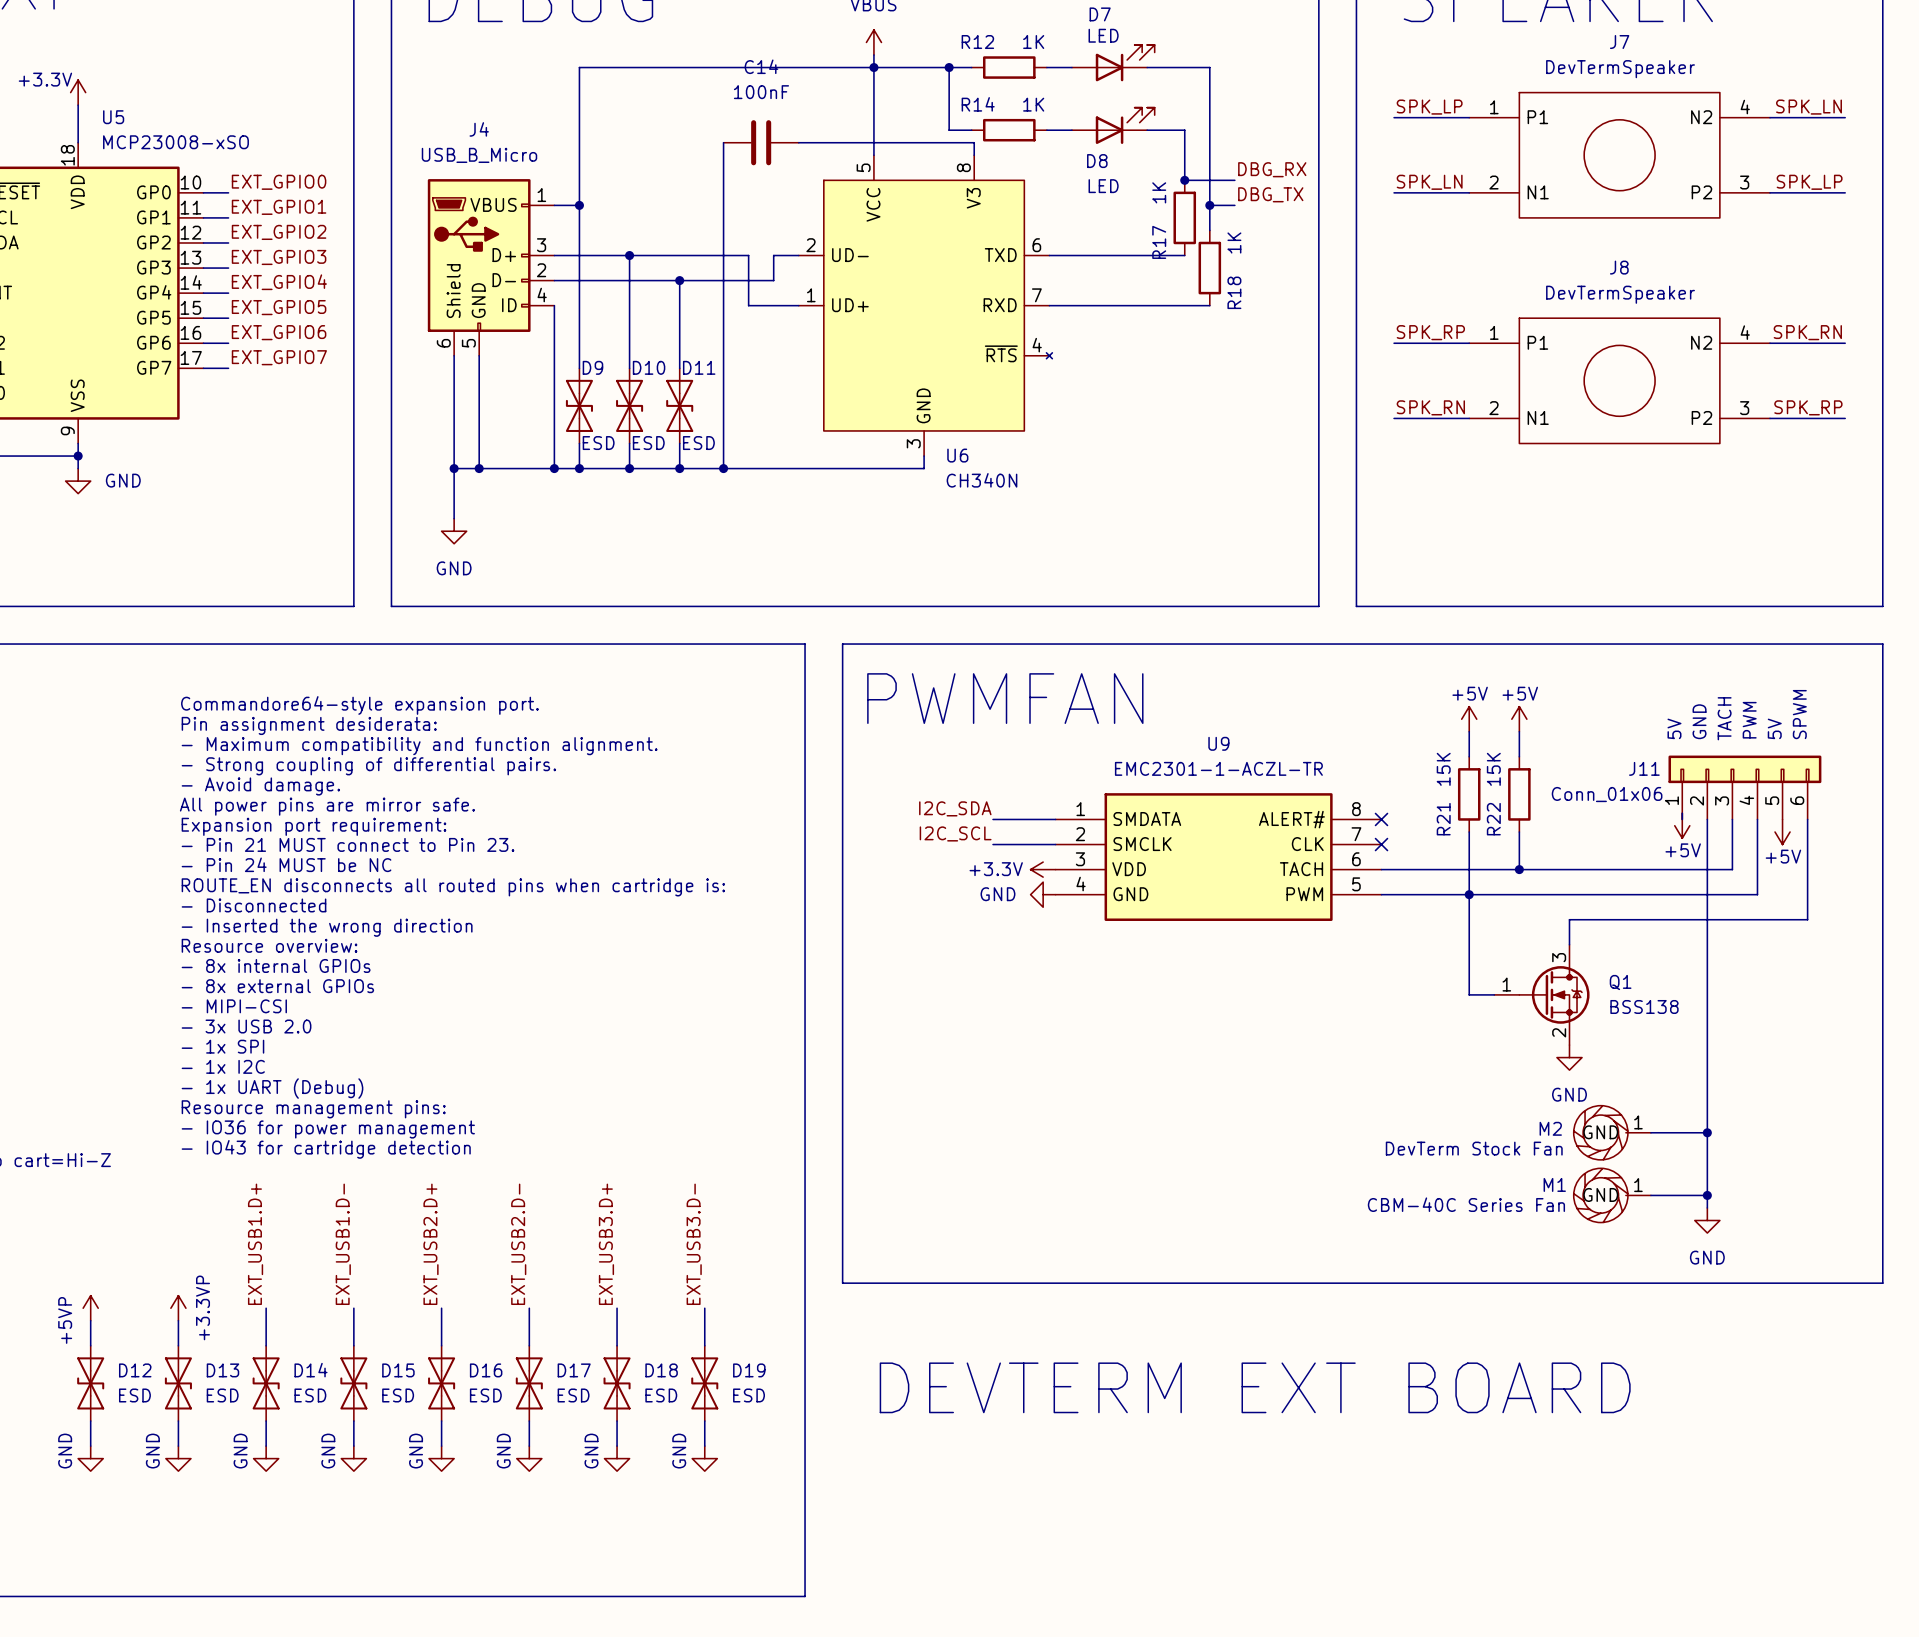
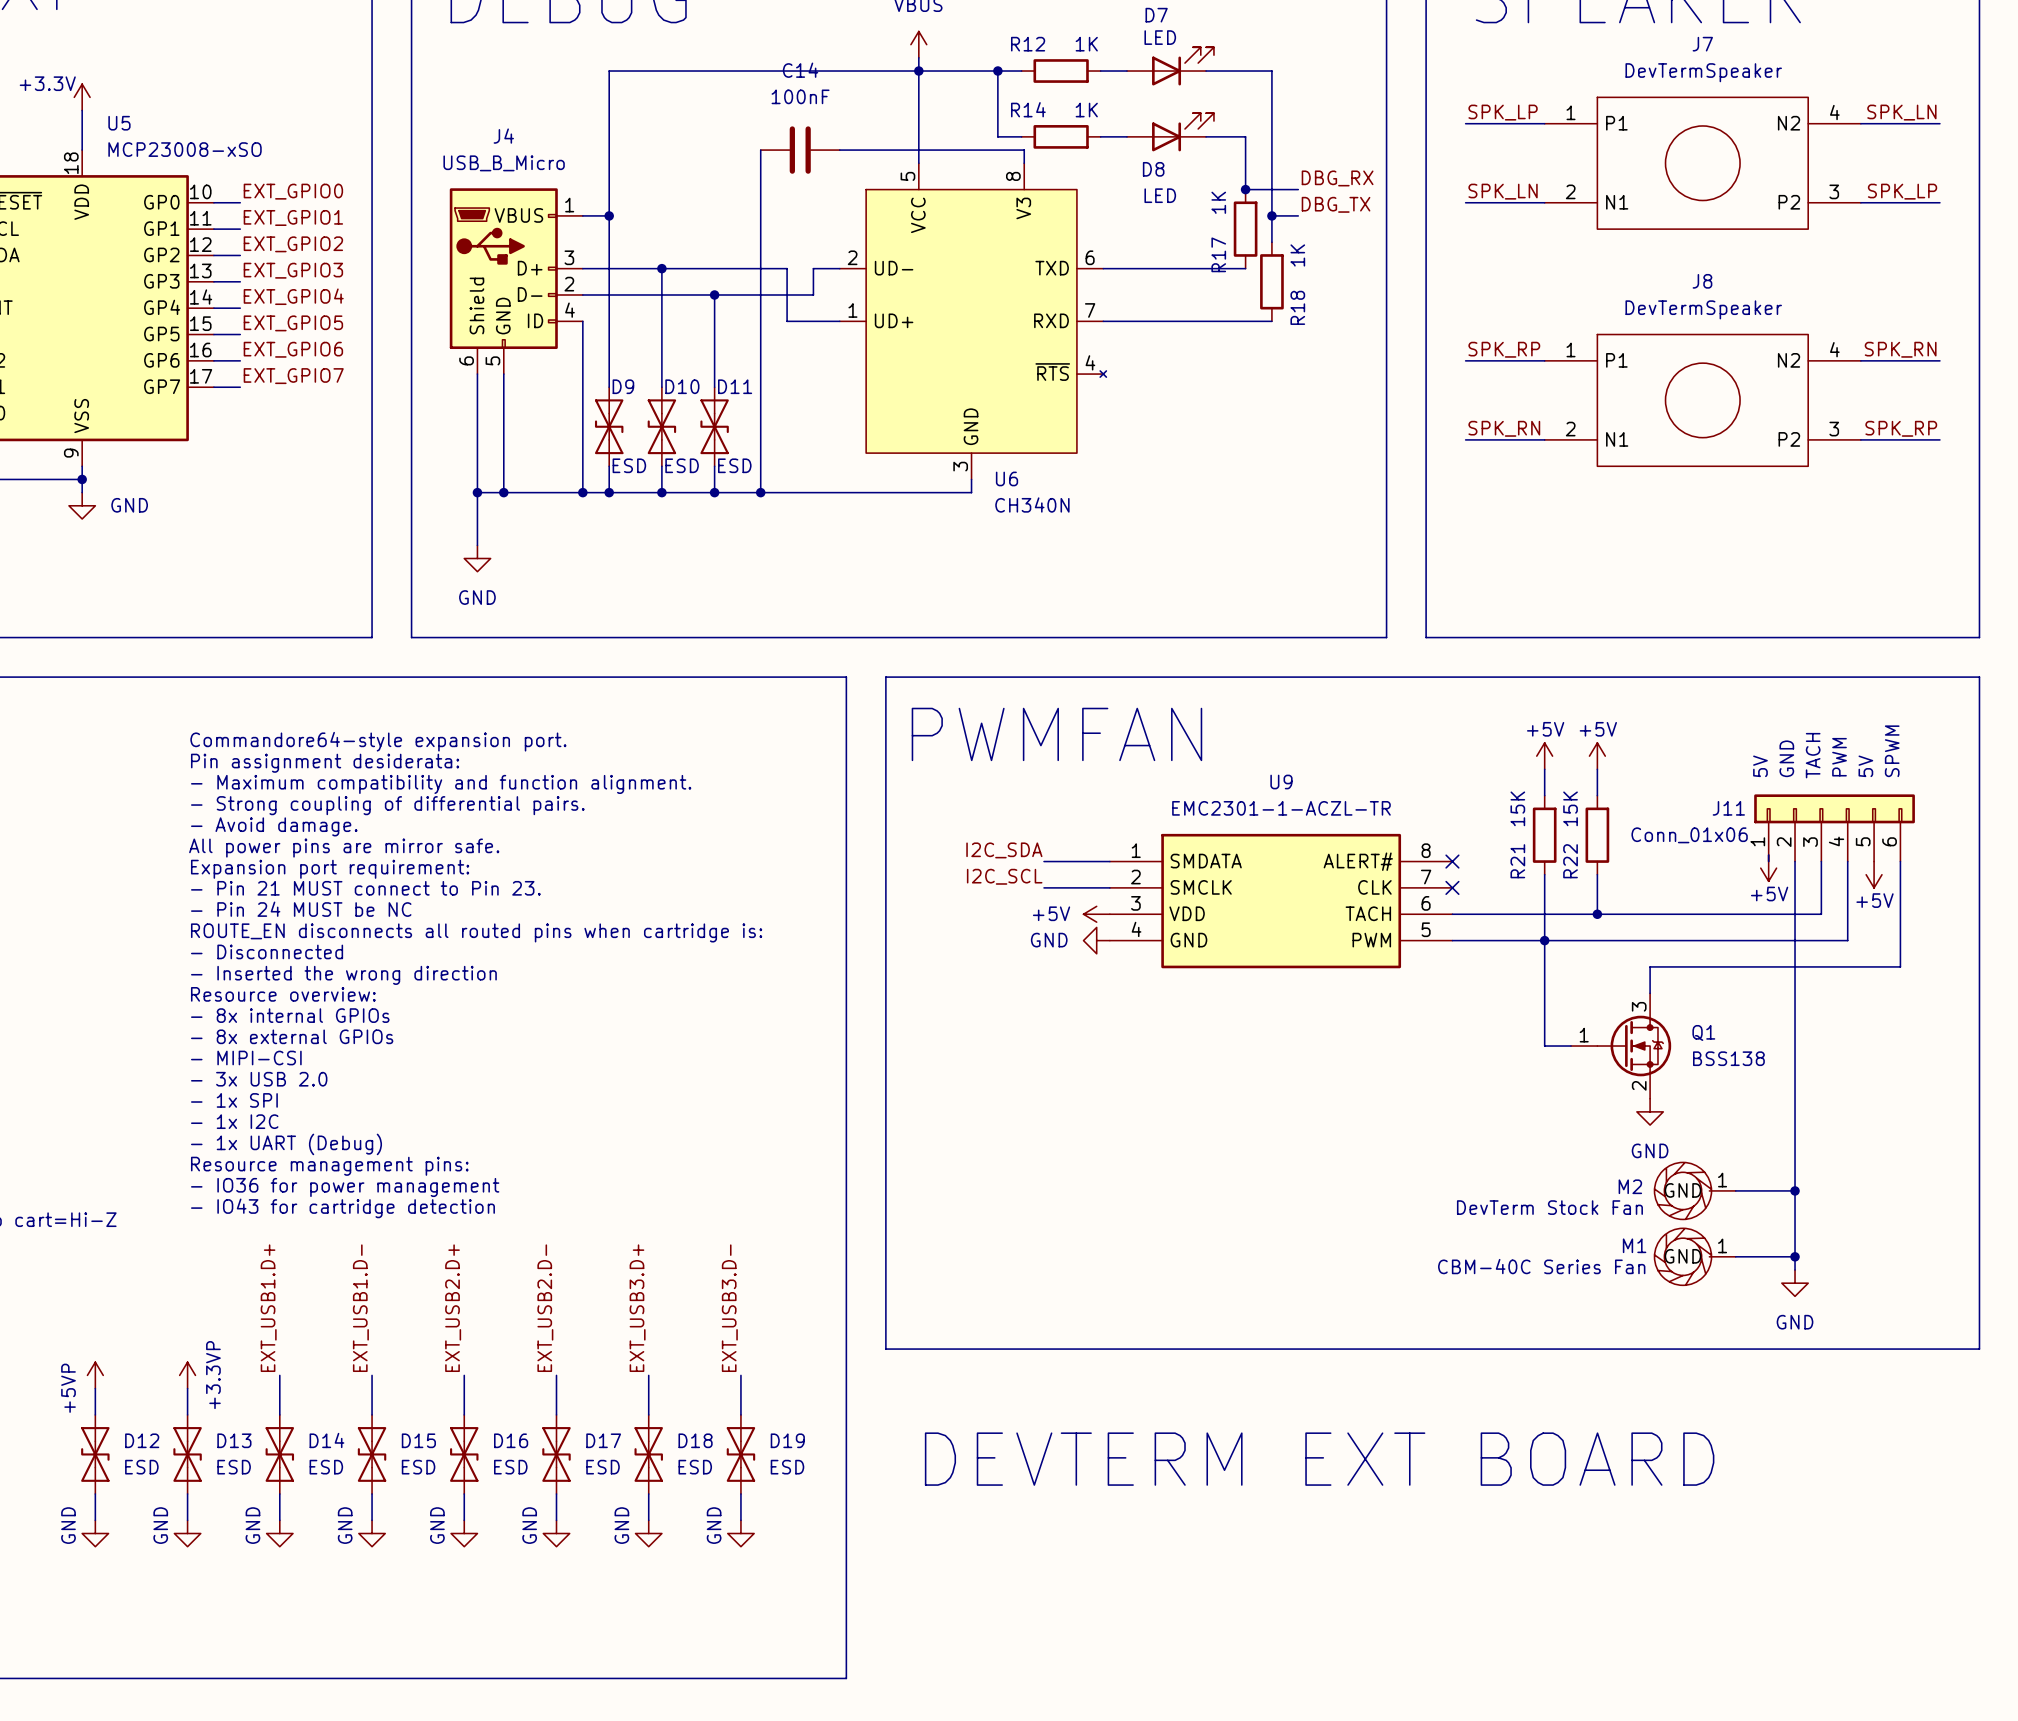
power symbol: +3.3V (1043, 869) -> +5V (1096, 914)

